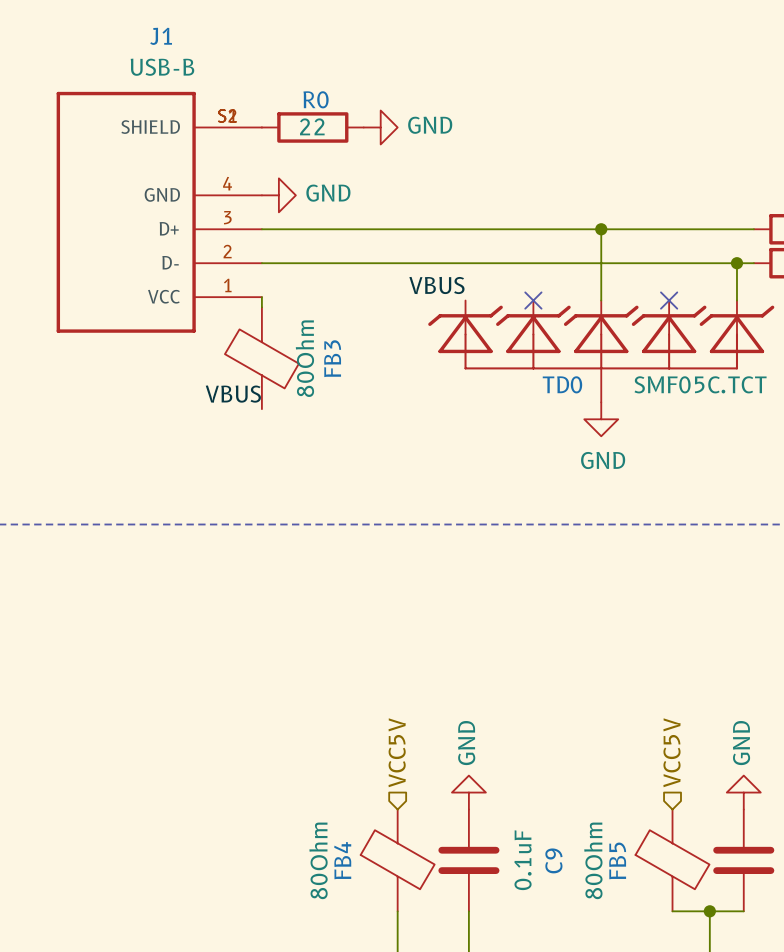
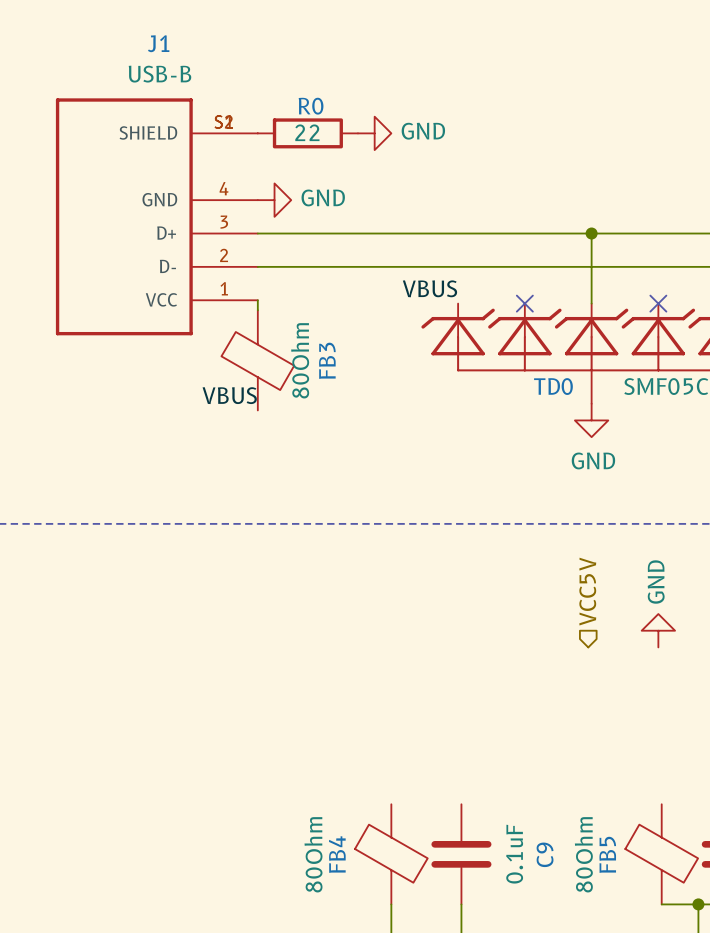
hierarchical label: none -> VCC5V (587, 591)
power symbol: none -> GND (658, 630)
hierarchical label: VCC5V (397, 752) -> none
hierarchical label: VCC5V (671, 752) -> none
power symbol: GND (468, 792) -> none

